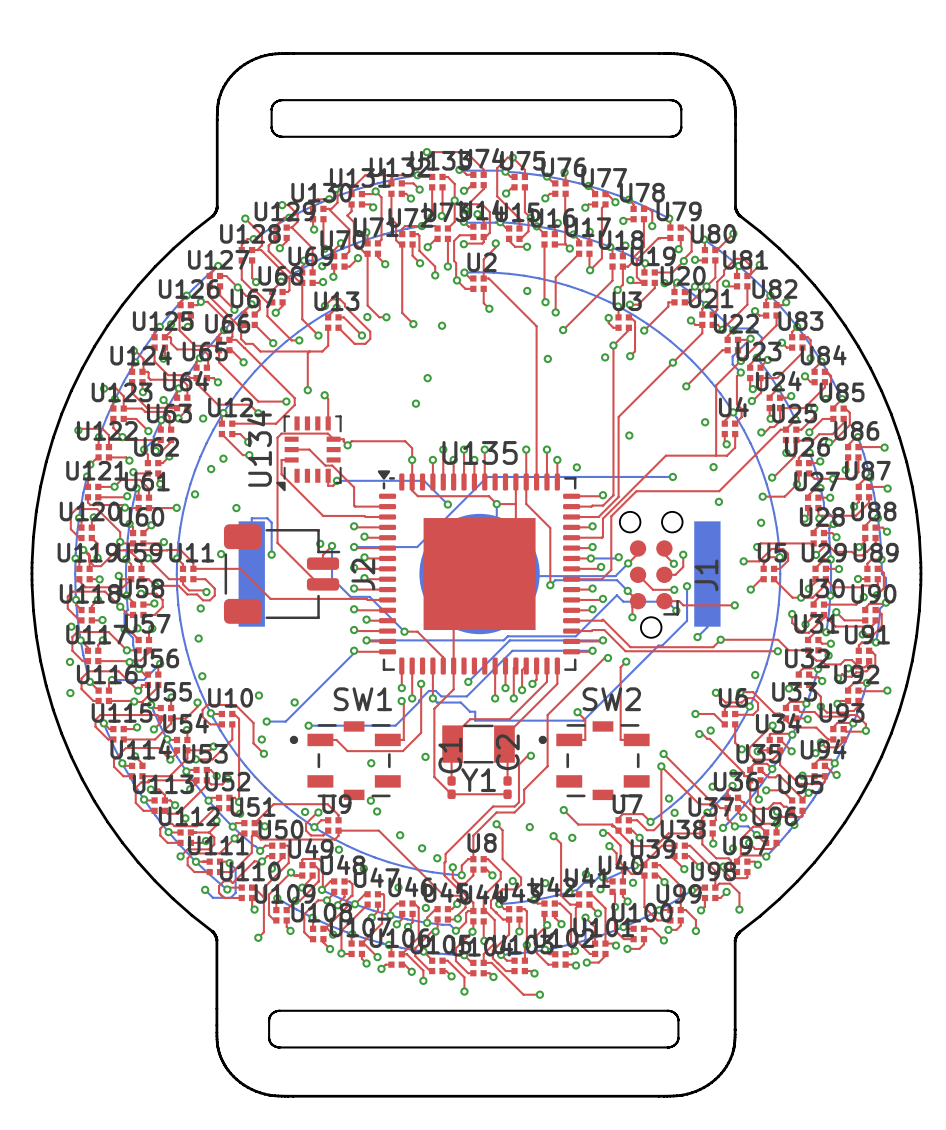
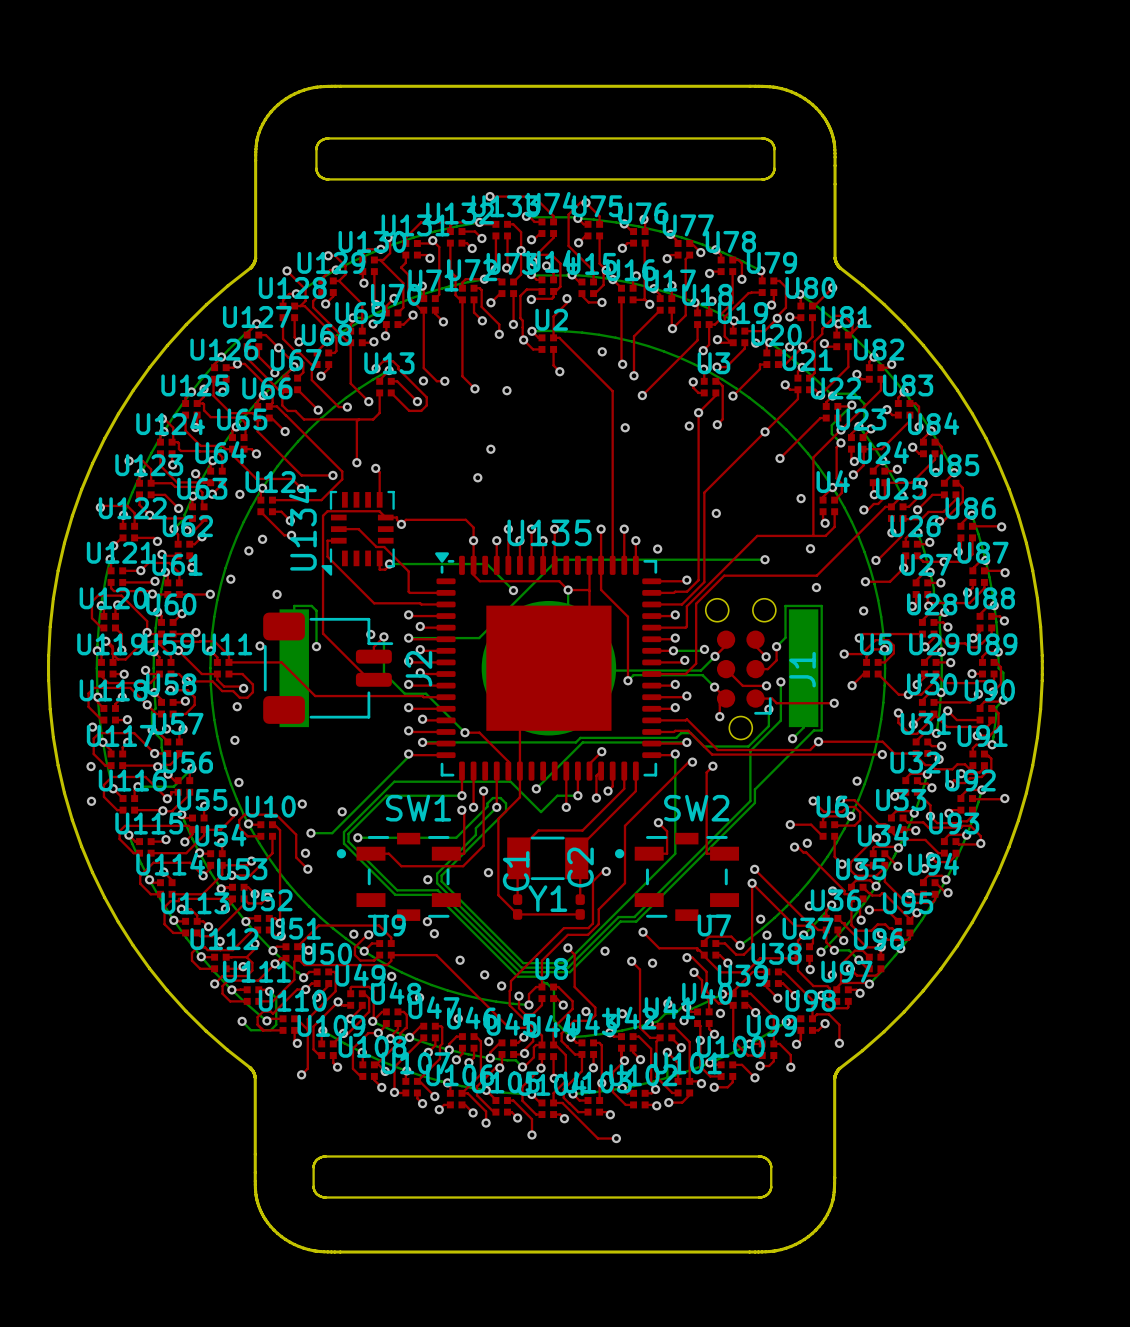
bottom track: none -> (776, 646) (785, 637) (785, 605) (821, 605) (821, 730) (813, 730) (754, 789) (754, 802) (636, 921) (620, 921) (569, 972) (519, 972) (437, 890) (397, 890) (348, 841) (348, 833) (386, 795) (461, 795)
bottom track: (676, 610) (667, 601) (623, 601) (616, 595) (575, 636) -> (768, 715) (768, 726) (748, 746) (704, 746) (690, 733) (681, 733) (676, 737) (656, 737)
bottom track: (662, 645) (658, 645) (583, 720) (475, 720) (475, 711) (470, 711) (460, 702) (436, 702) (432, 698) -> (753, 748) (750, 750) (750, 801) (634, 917) (618, 917) (568, 967) (521, 967) (437, 883) (437, 873) (475, 834) (475, 828) (496, 807)
top track: none -> (601, 751) (589, 763)
bottom track: (592, 650) (512, 650) (466, 696) (441, 696) (435, 690) (428, 690) (395, 725) -> (675, 754) (675, 853) (565, 963) (523, 963) (441, 881) (441, 875) (506, 811) (506, 803) (500, 798) (492, 798) (487, 803) (487, 806) (455, 837)
top track: (515, 666) (513, 668) (513, 698) -> none
bottom track: none -> (577, 795) (557, 795) (541, 812) (510, 781) (394, 781) (343, 832) (343, 843) (395, 894) (435, 894) (517, 976) (538, 976) (547, 983) (554, 990) (554, 1020) (570, 1037)
via position: (513, 698) -> (601, 751)

